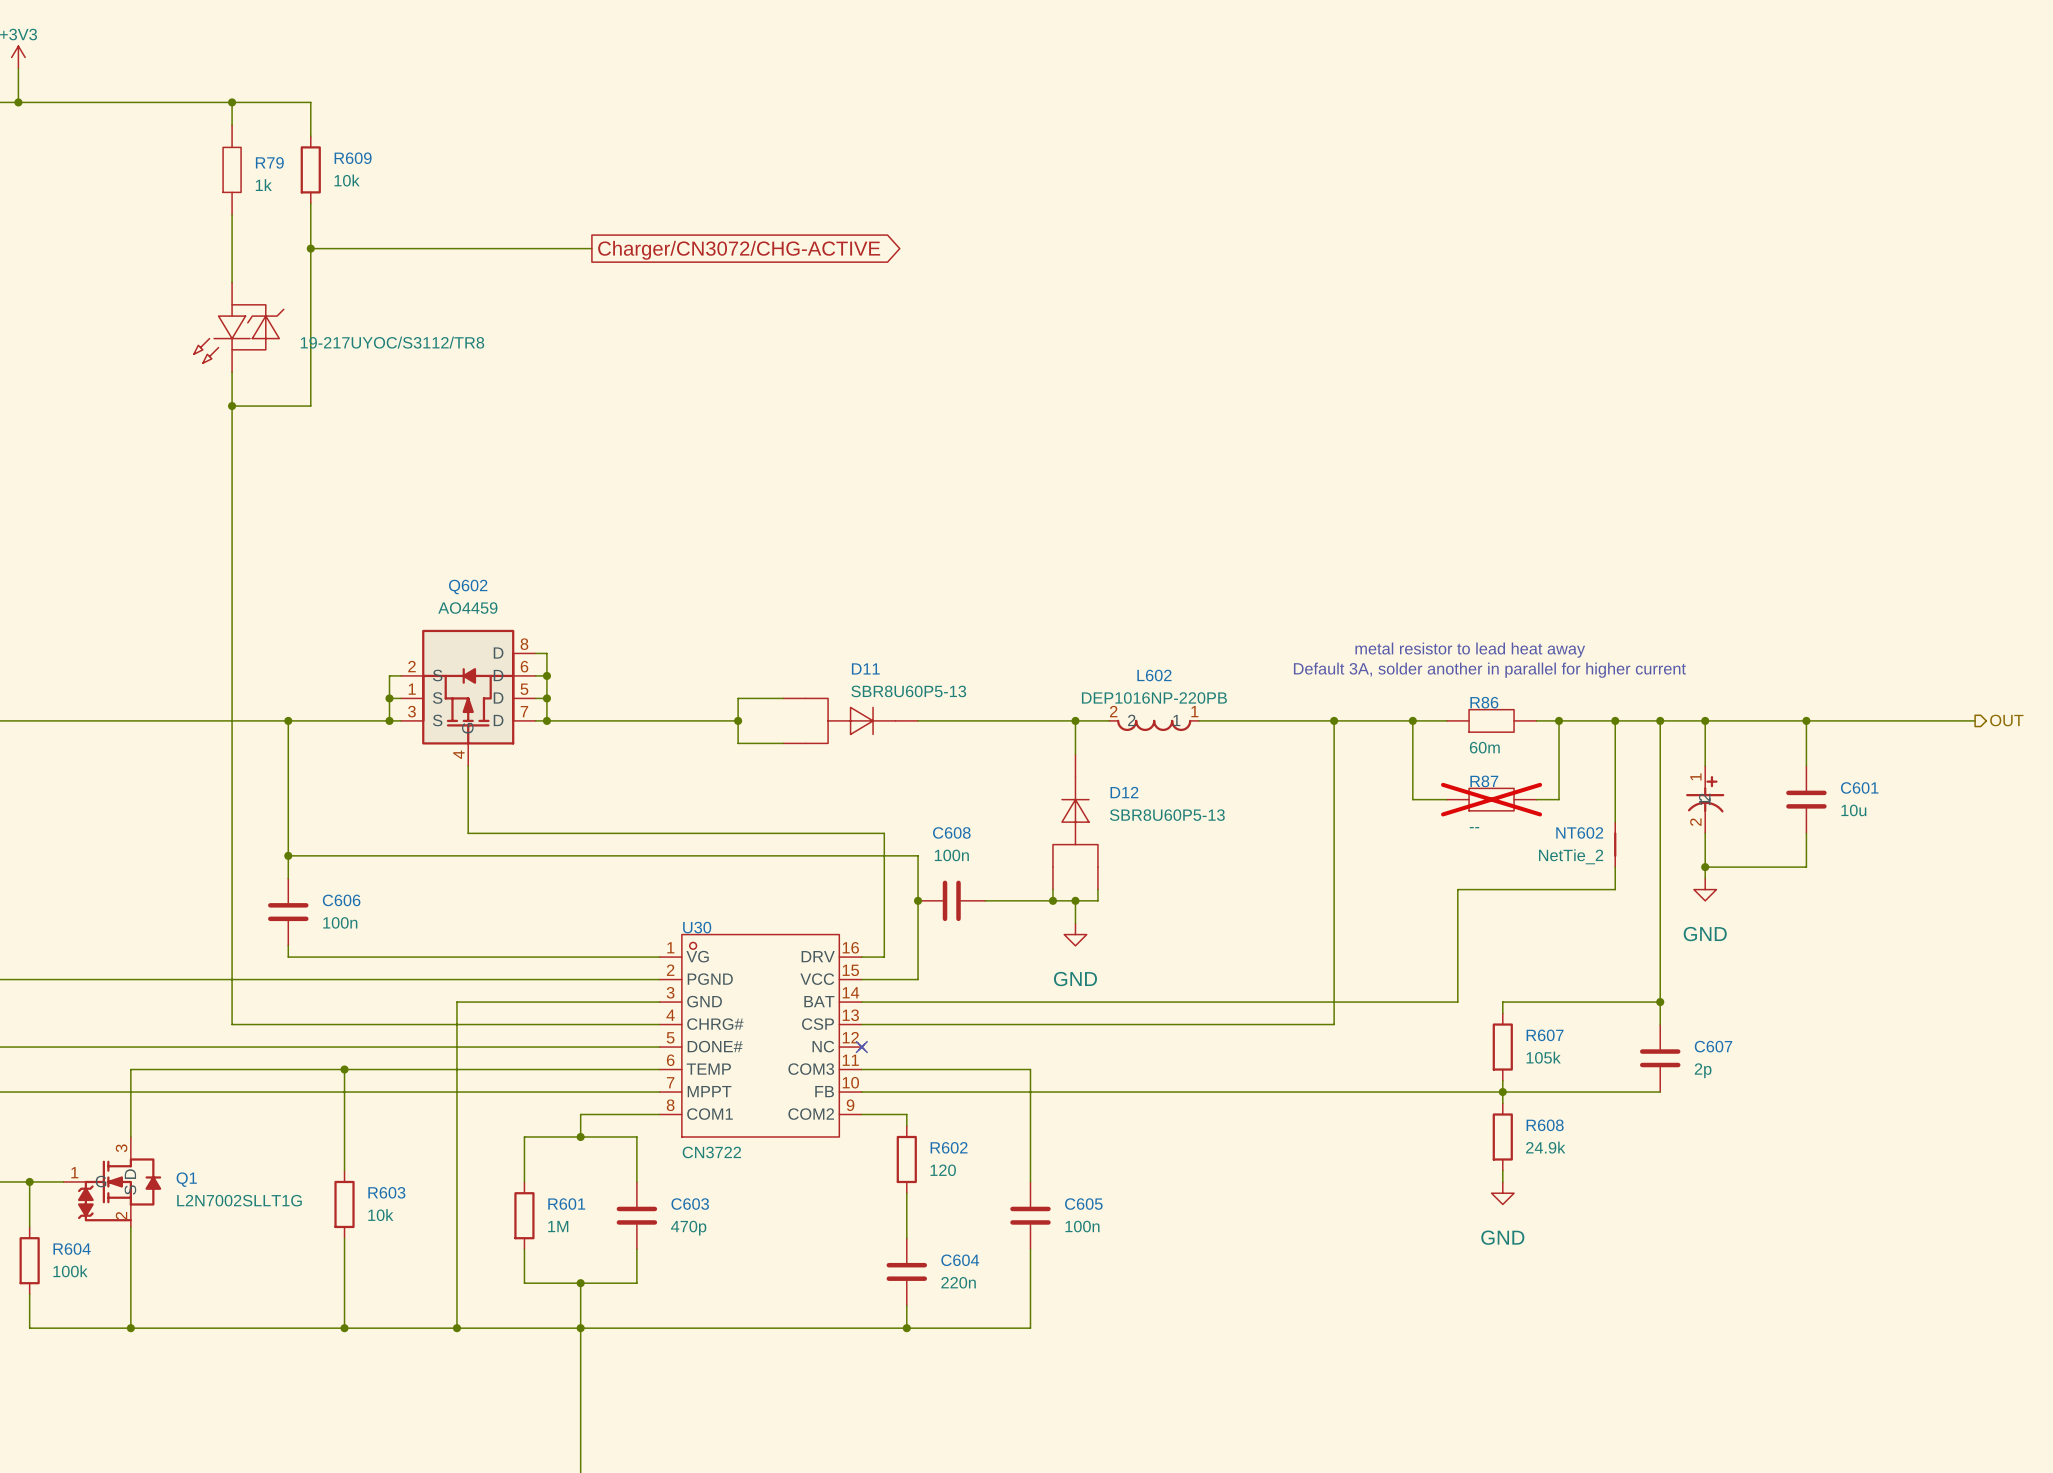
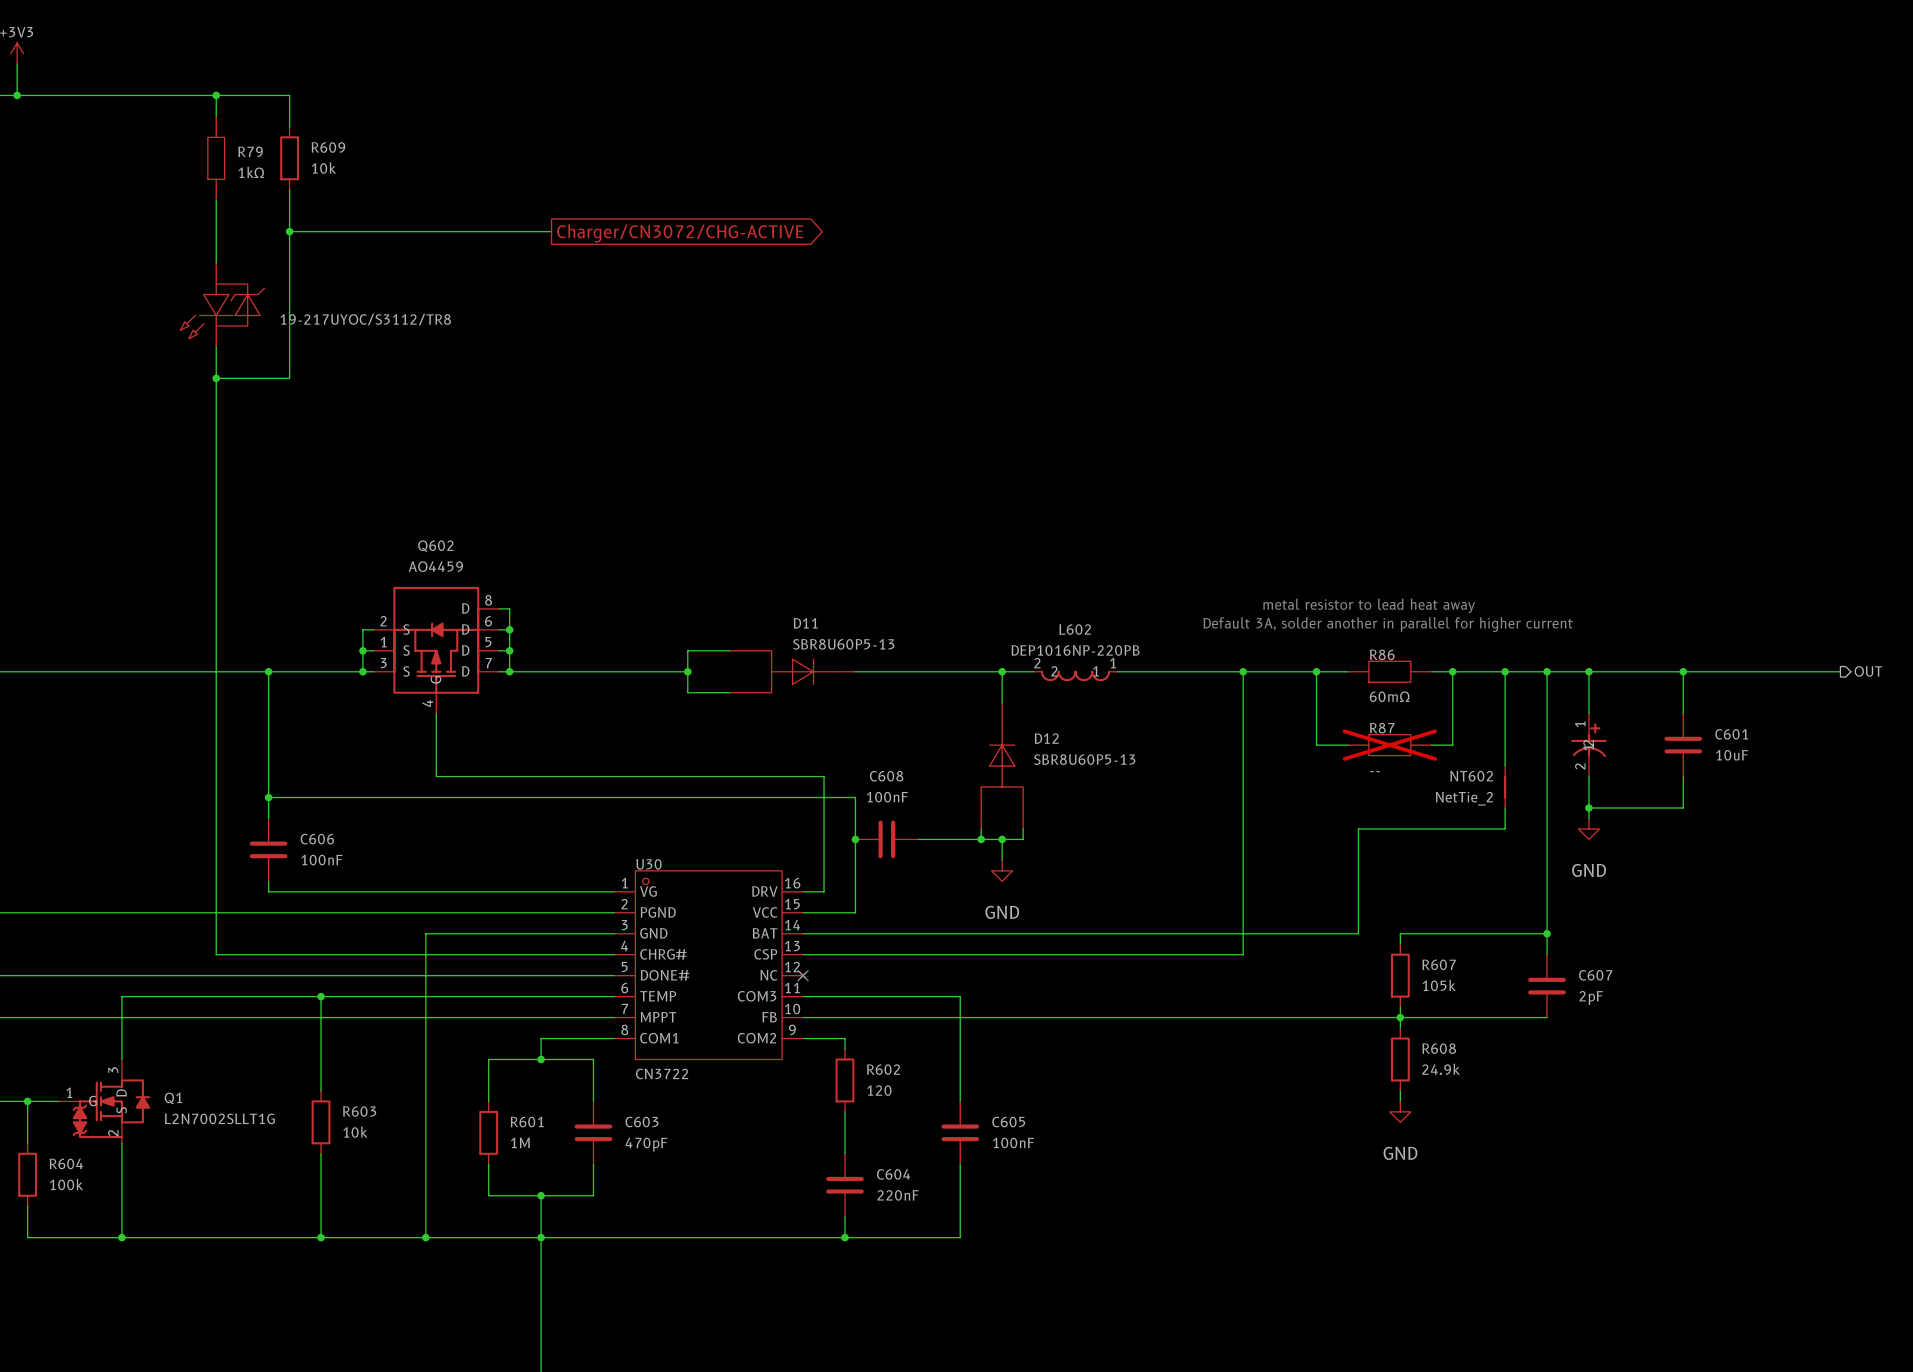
R79 value: 1k (263, 185) -> 1kΩ (251, 172)
R86 value: 60m (1484, 747) -> 60mΩ (1389, 696)
C601 value: 10u (1853, 810) -> 10uF (1732, 755)
C608 value: 100n (951, 855) -> 100nF (887, 797)
C606 value: 100n (340, 922) -> 100nF (321, 860)
C607 value: 2p (1703, 1070) -> 2pF (1591, 997)
C605 value: 100n (1082, 1226) -> 100nF (1013, 1142)
C603 value: 470p (688, 1228) -> 470pF (646, 1144)
C604 value: 220n (958, 1282) -> 220nF (898, 1195)

